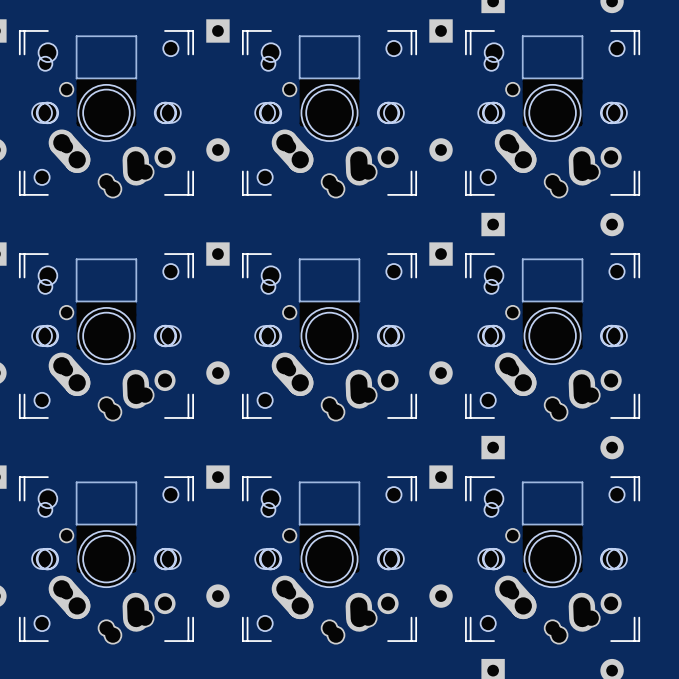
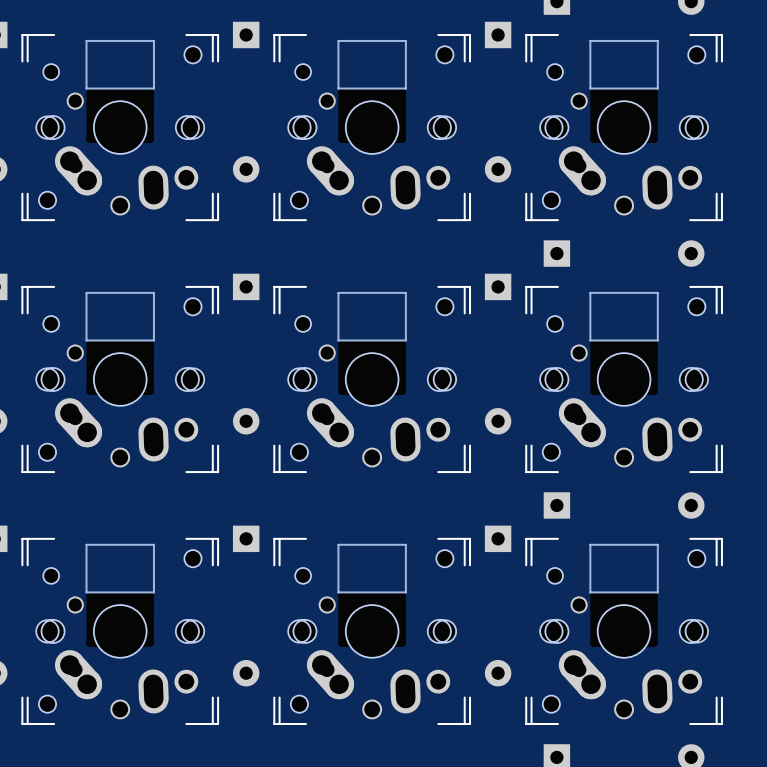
part footprint: [18, 30, 194, 199] -> [21, 34, 220, 222]
part footprint: [241, 30, 418, 199] -> [273, 34, 472, 222]
part footprint: [465, 30, 641, 199] -> [525, 34, 723, 222]
part footprint: [18, 253, 194, 422] -> [21, 285, 220, 474]
part footprint: [241, 253, 418, 422] -> [273, 285, 472, 474]
part footprint: [465, 253, 641, 422] -> [525, 285, 723, 474]
part footprint: [18, 476, 194, 645] -> [21, 537, 220, 725]
part footprint: [241, 476, 418, 645] -> [273, 537, 472, 725]
part footprint: [465, 476, 641, 645] -> [525, 537, 723, 725]

